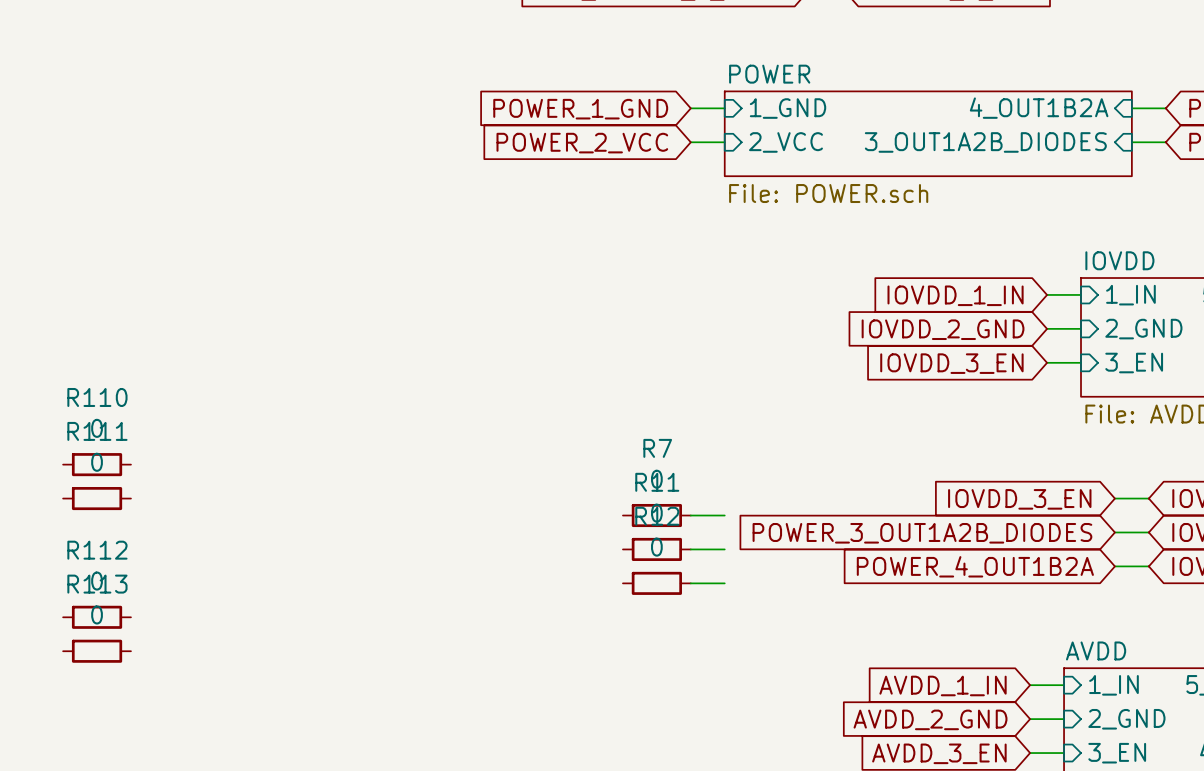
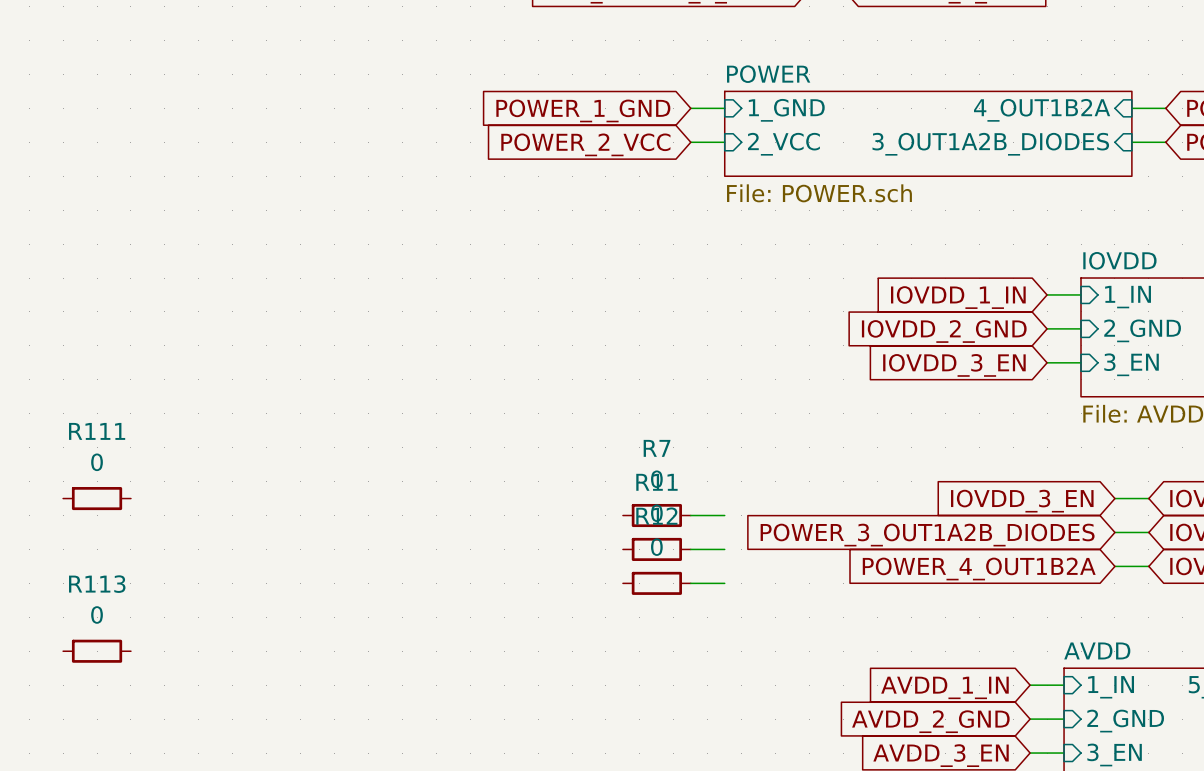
R110: 0 (97, 464) -> none
R112: 0 (97, 617) -> none

